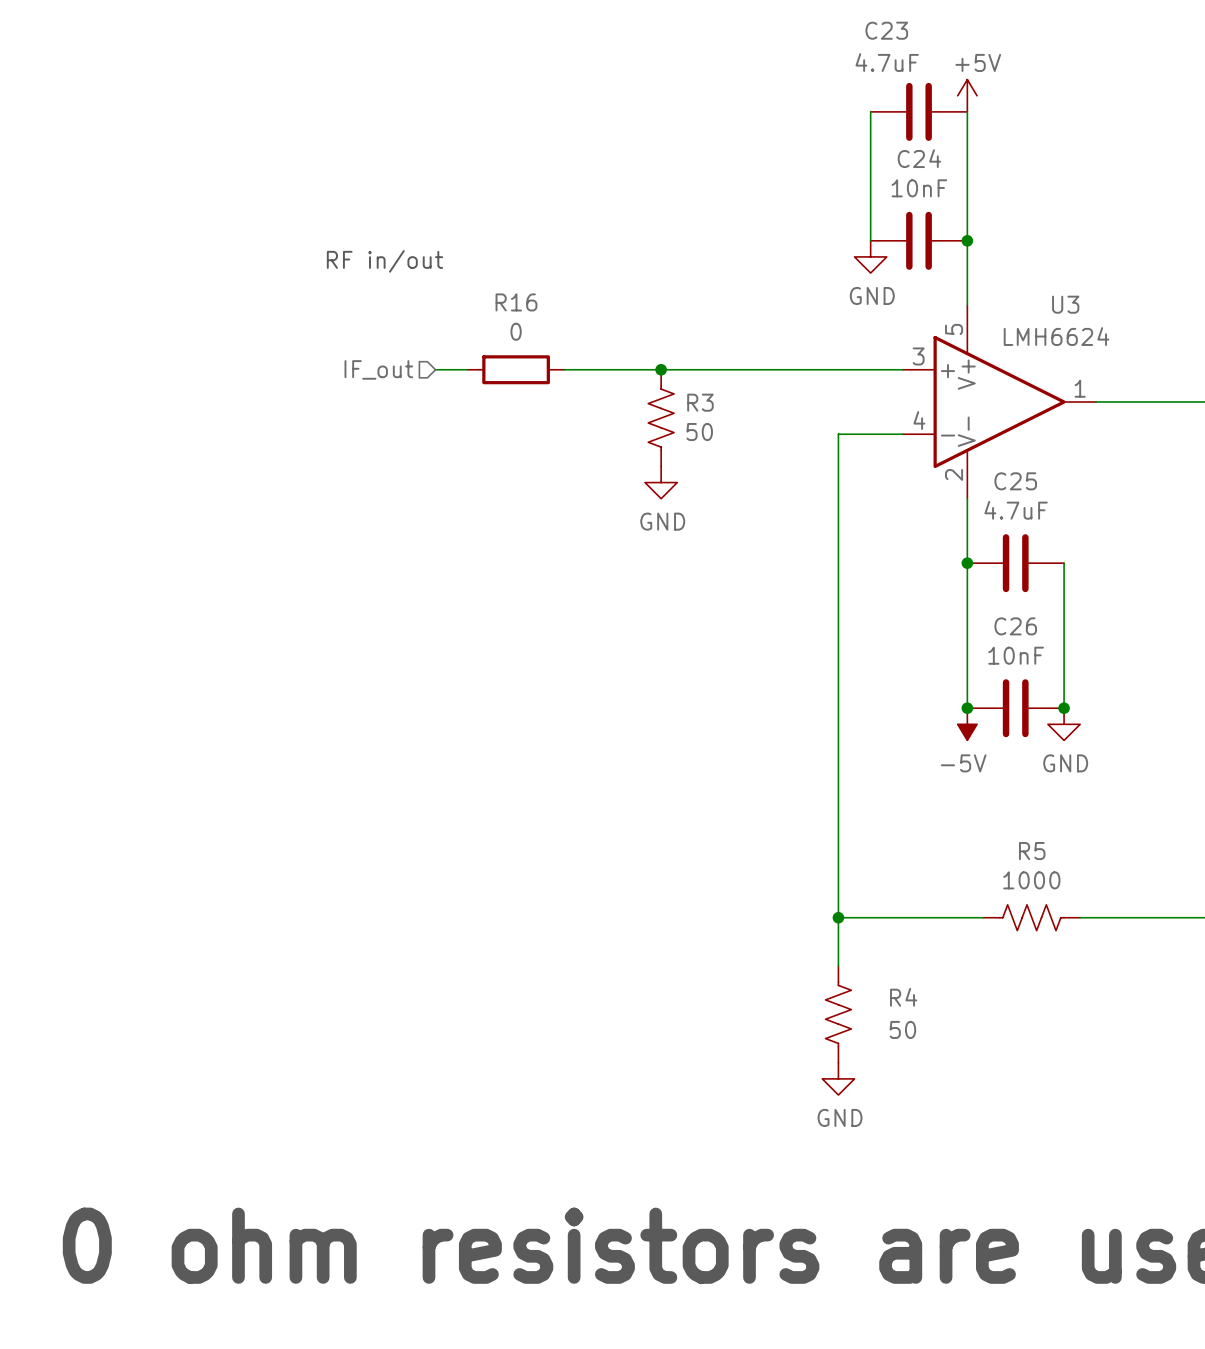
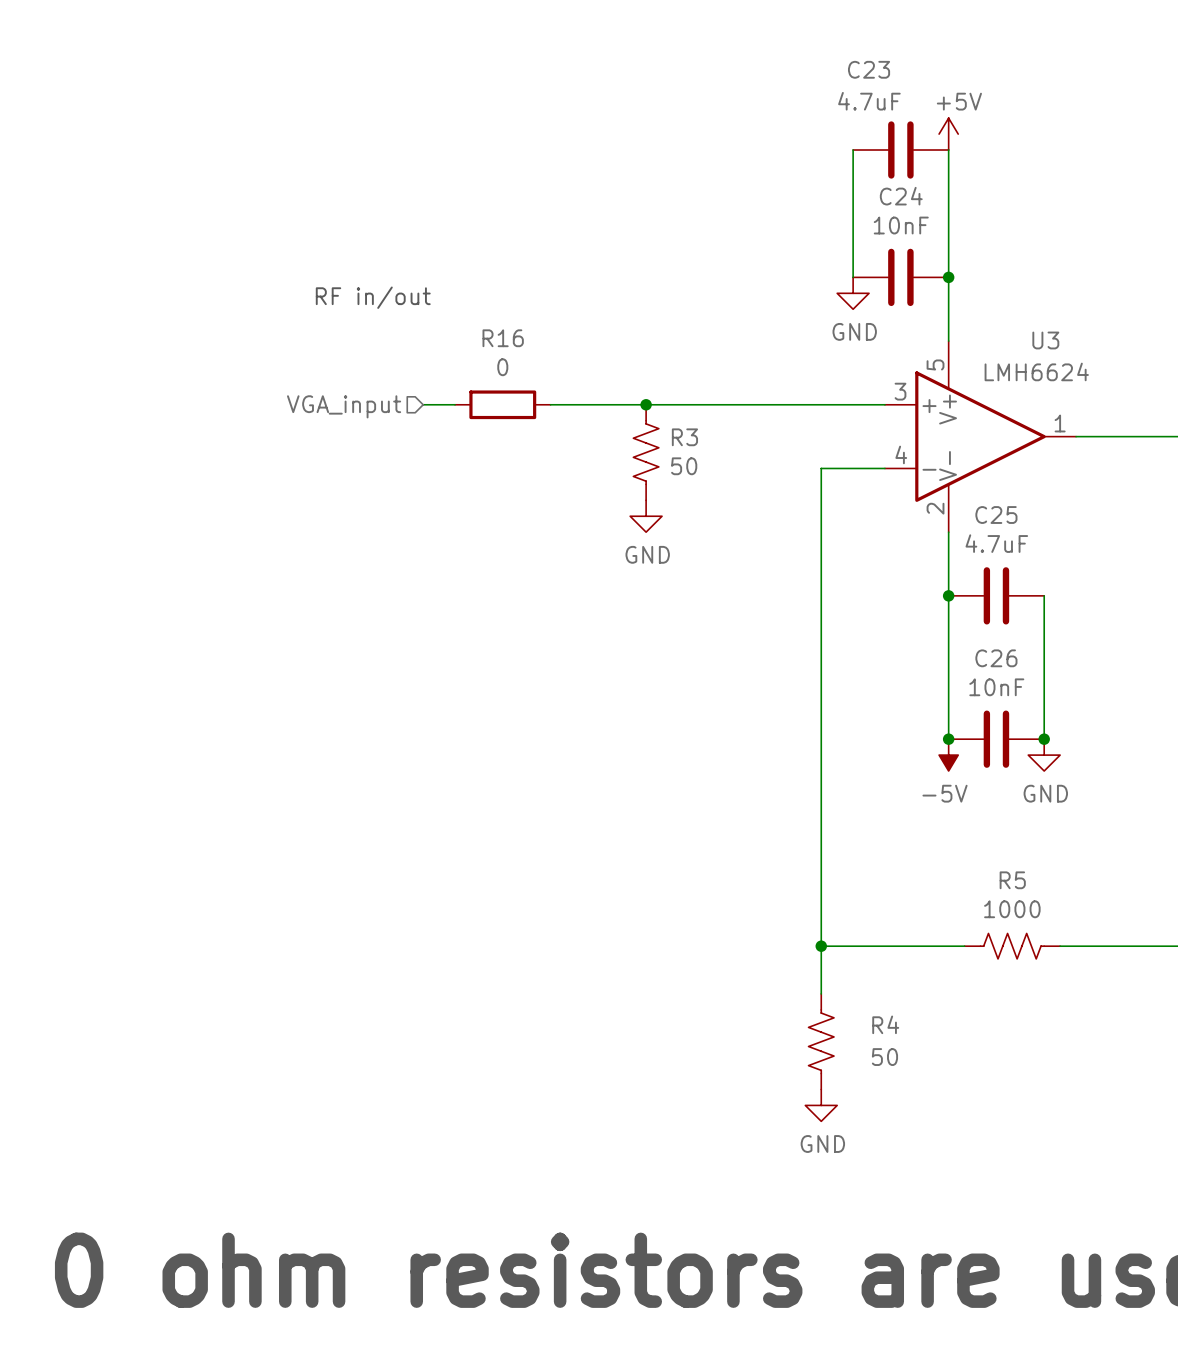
hierarchical label: IF_out (378, 369) -> VGA_input (344, 406)

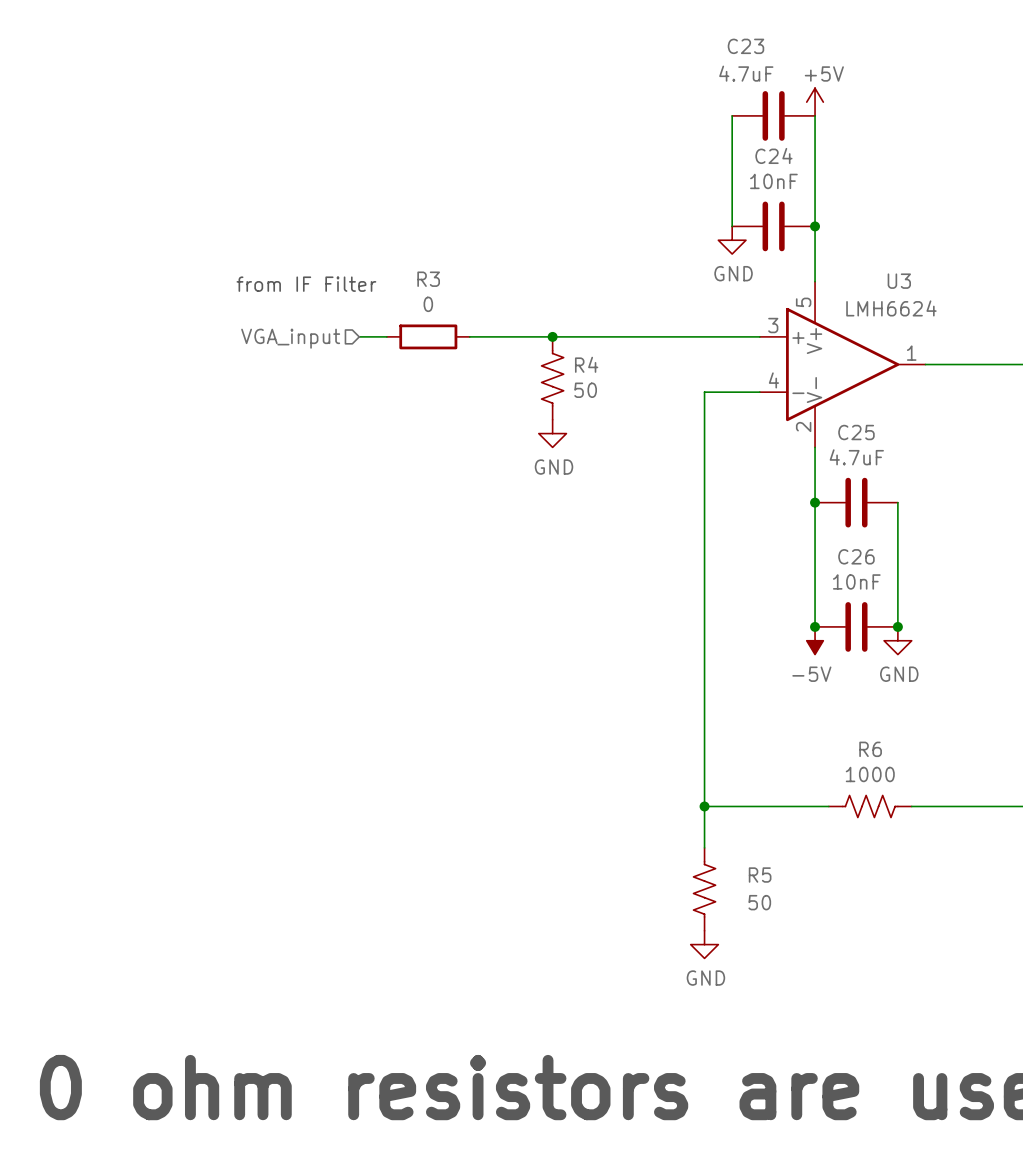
text: RF in/out (373, 297) -> none
R16 name: R16 (503, 338) -> R3 (428, 279)
text: none -> from IF Filter (306, 284)
R3 name: R3 (684, 437) -> R4 (586, 364)
R5 name: R5 (1012, 880) -> R6 (870, 749)
R4 name: R4 (885, 1024) -> R5 (760, 875)

